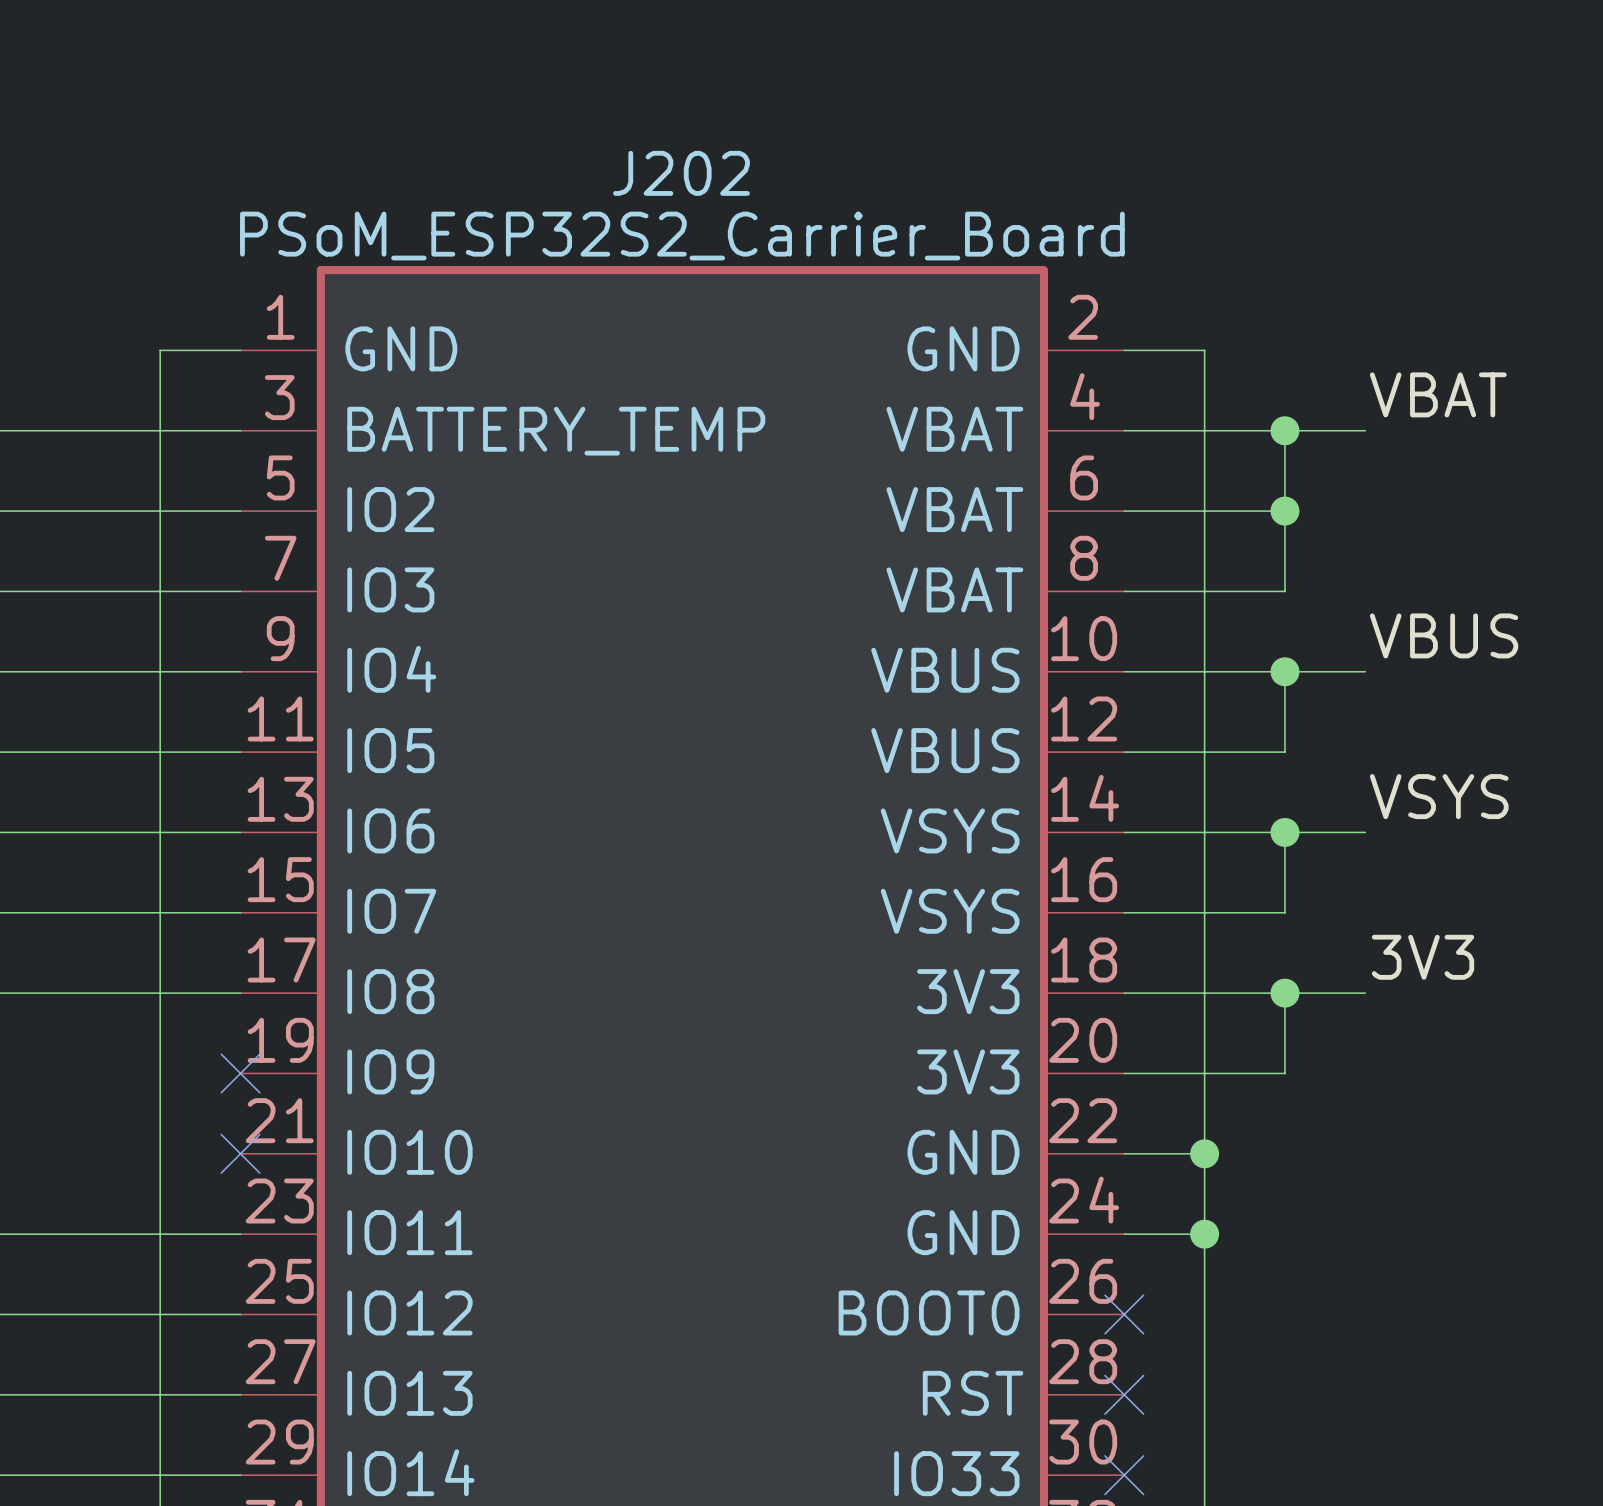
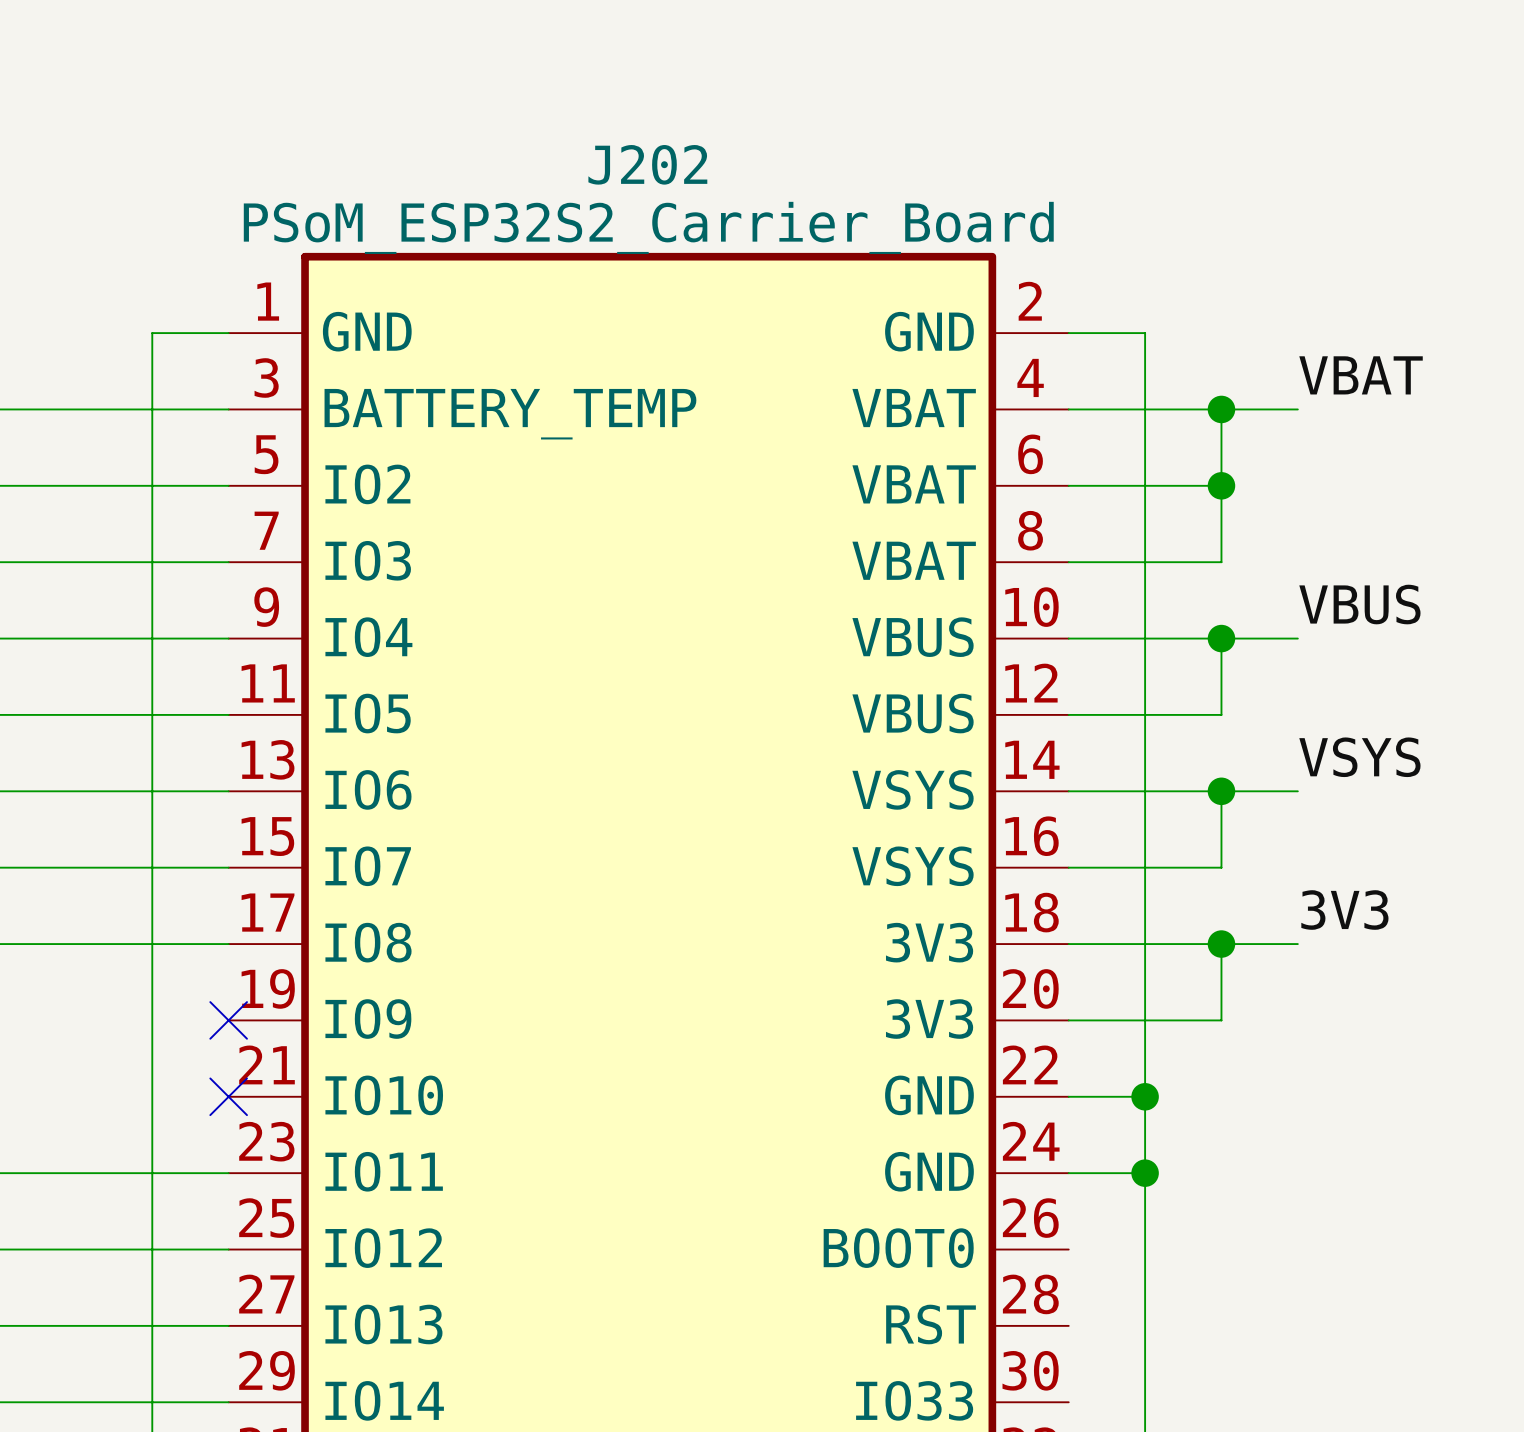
no-connect mark: (1124, 1314) -> none
no-connect mark: (1124, 1394) -> none
no-connect mark: (1124, 1475) -> none

